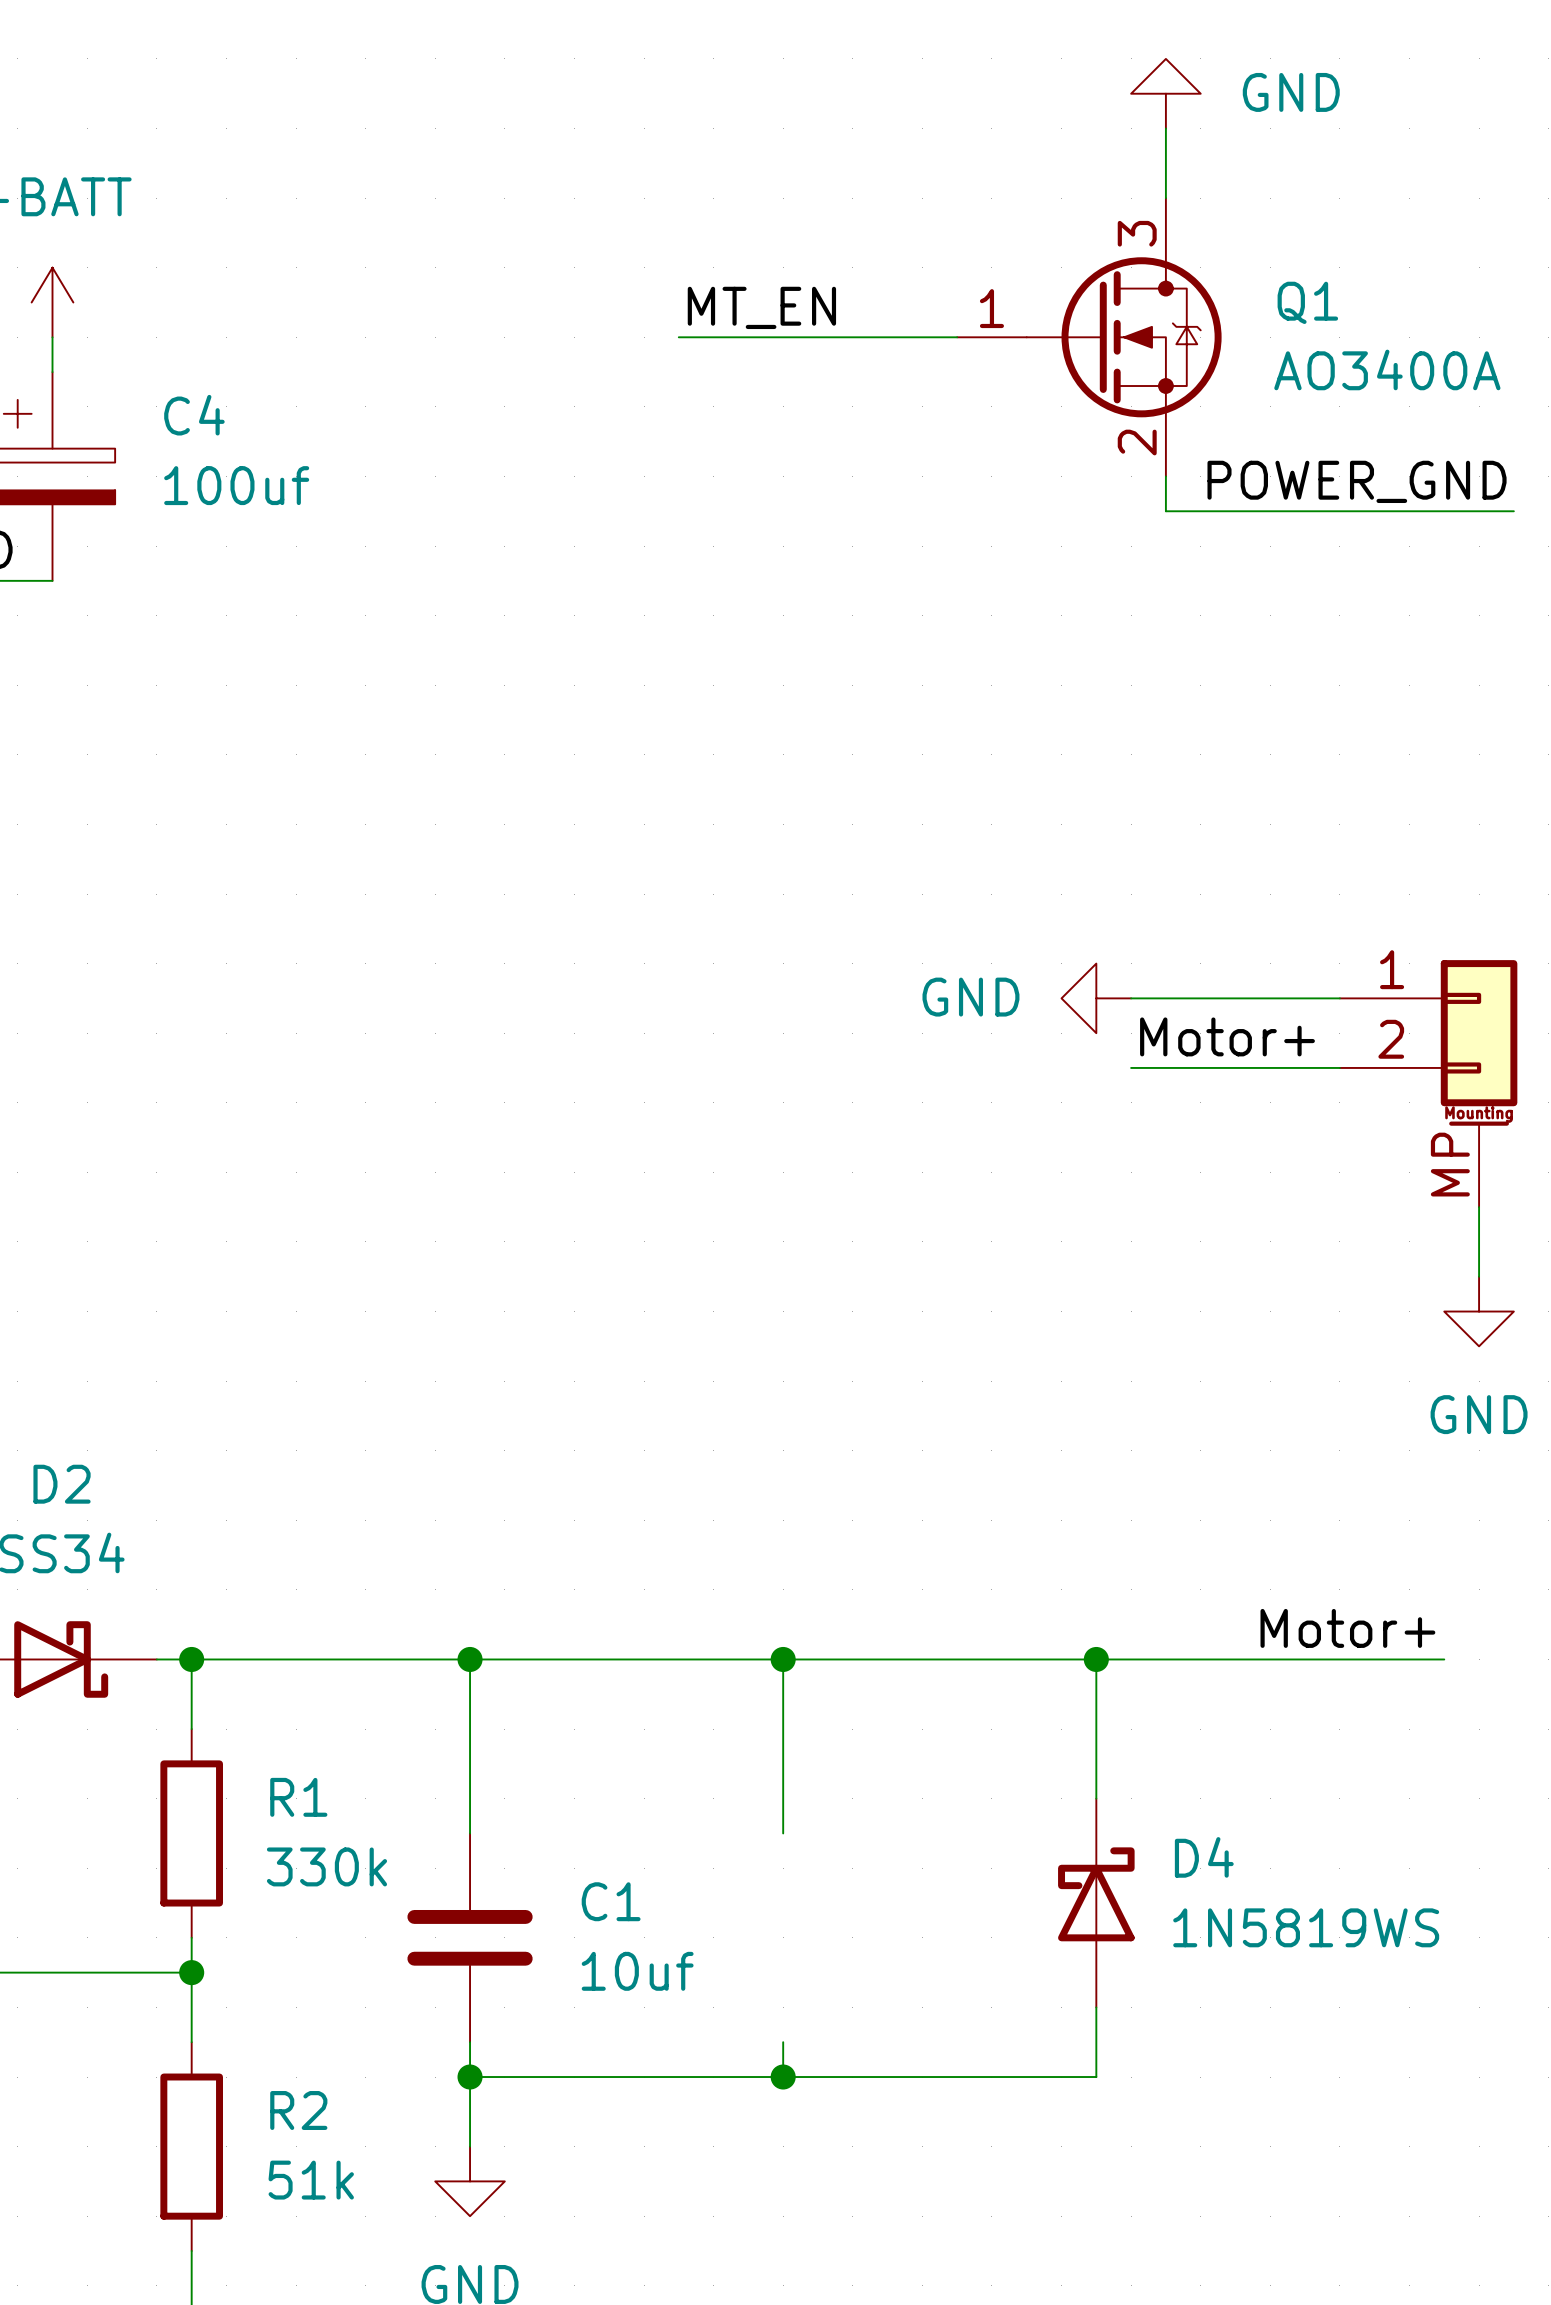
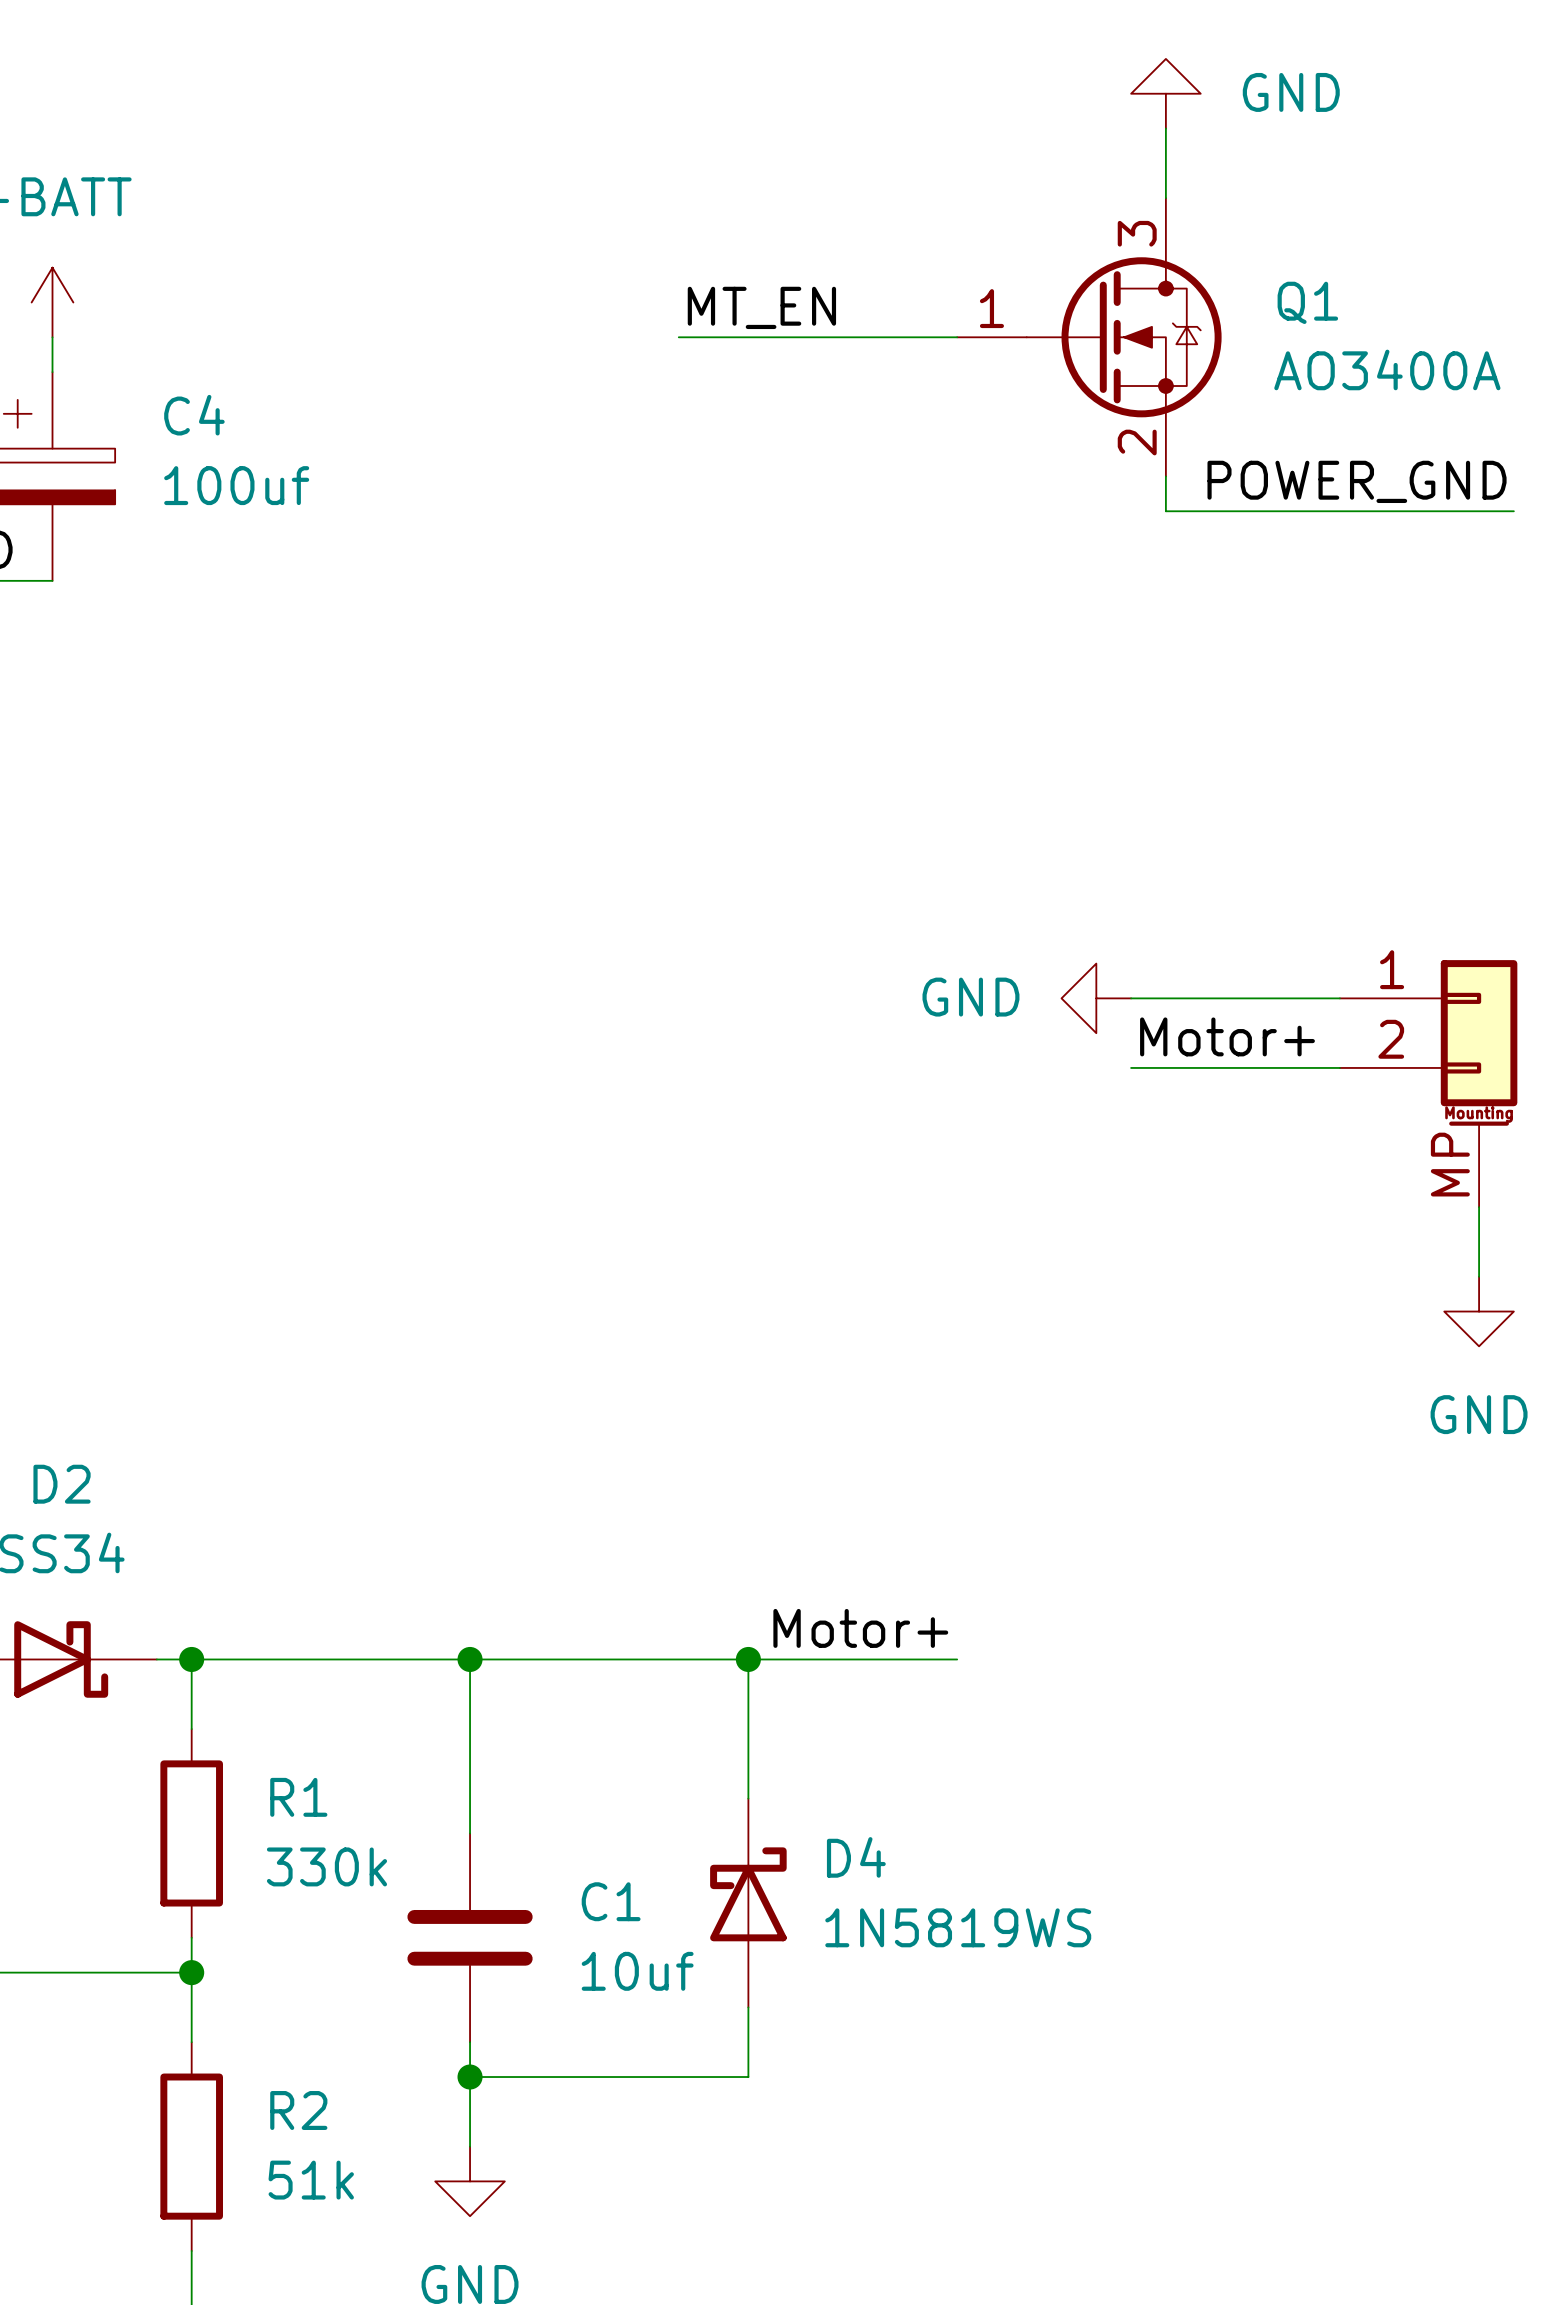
label position: Motor+ (1347, 1628) -> Motor+ (860, 1628)
wire: (783, 1659) (783, 1833) -> none
junction position: (783, 1659) -> (748, 1659)
wire: (957, 1659) (1444, 1659) -> none
wire: (1096, 1659) (1096, 1798) -> (748, 1659) (748, 1798)
junction: (1096, 1659) -> none
D4 position: (1096, 1903) -> (748, 1903)
wire: (1096, 2007) (1096, 2077) (748, 2077) -> (748, 2007) (748, 2077)
wire: (783, 2042) (783, 2077) -> none
junction: (783, 2077) -> none

